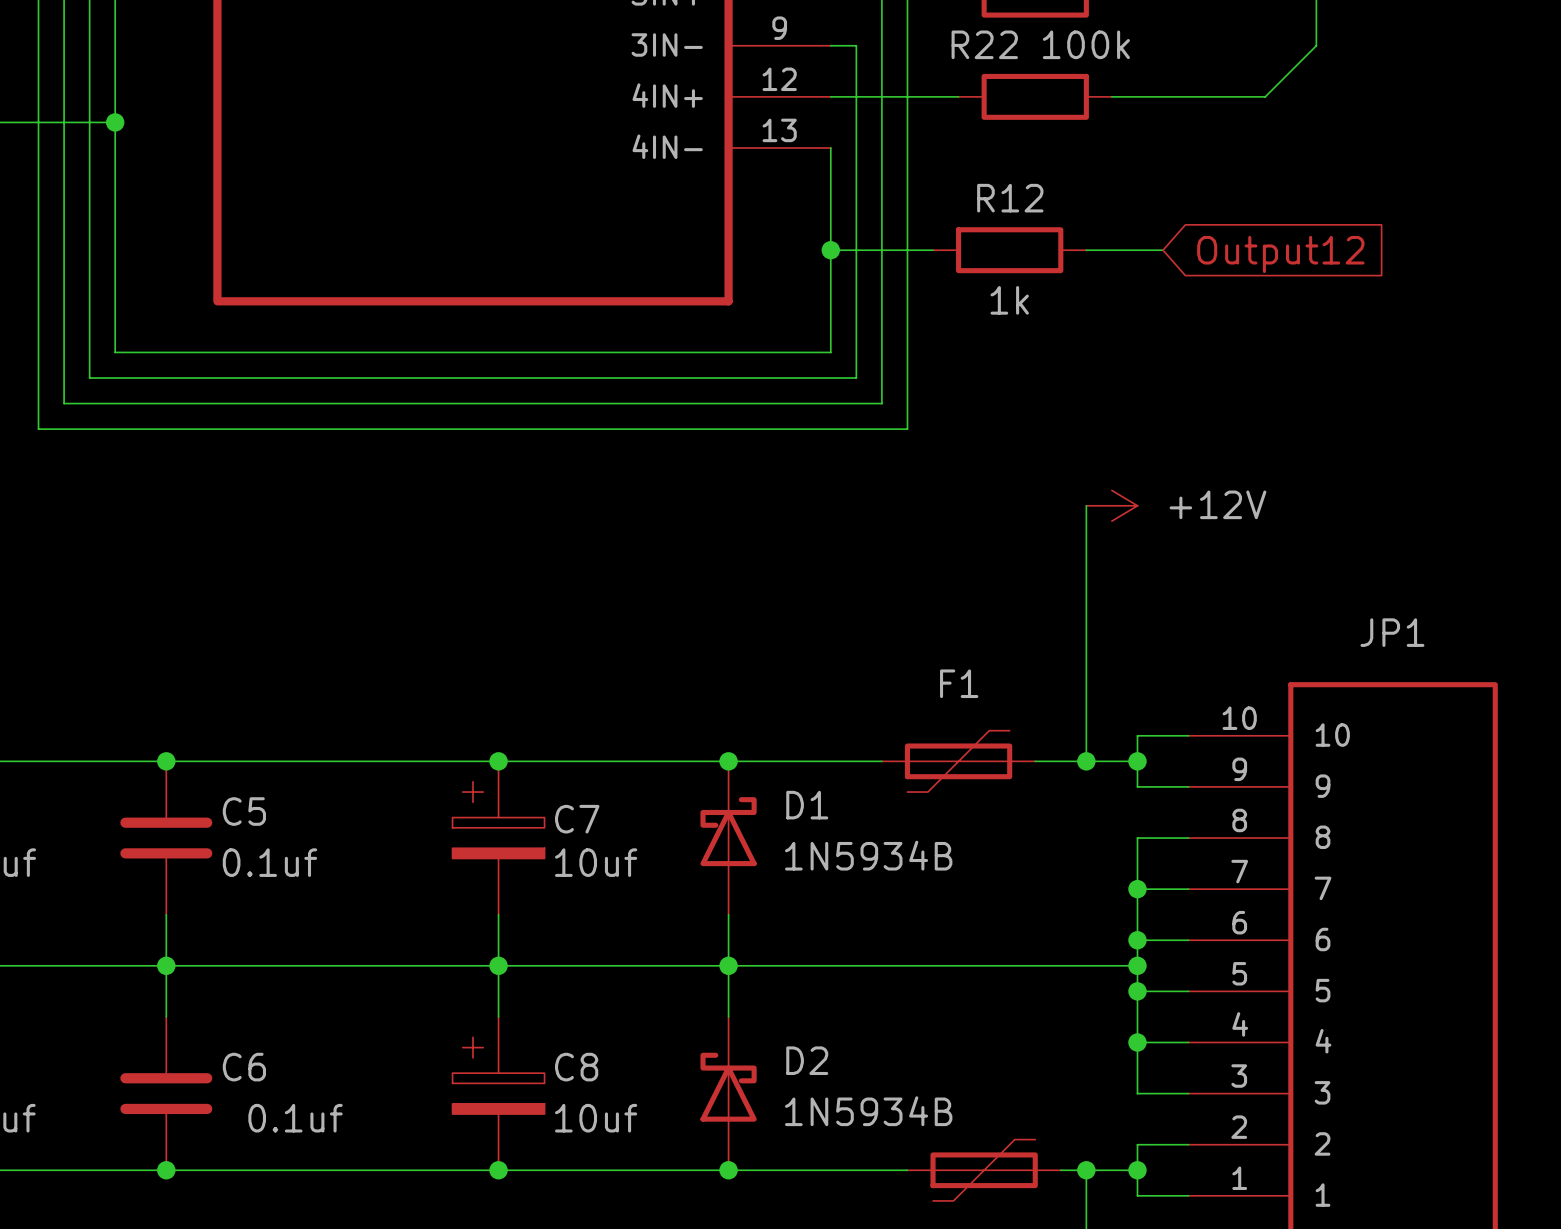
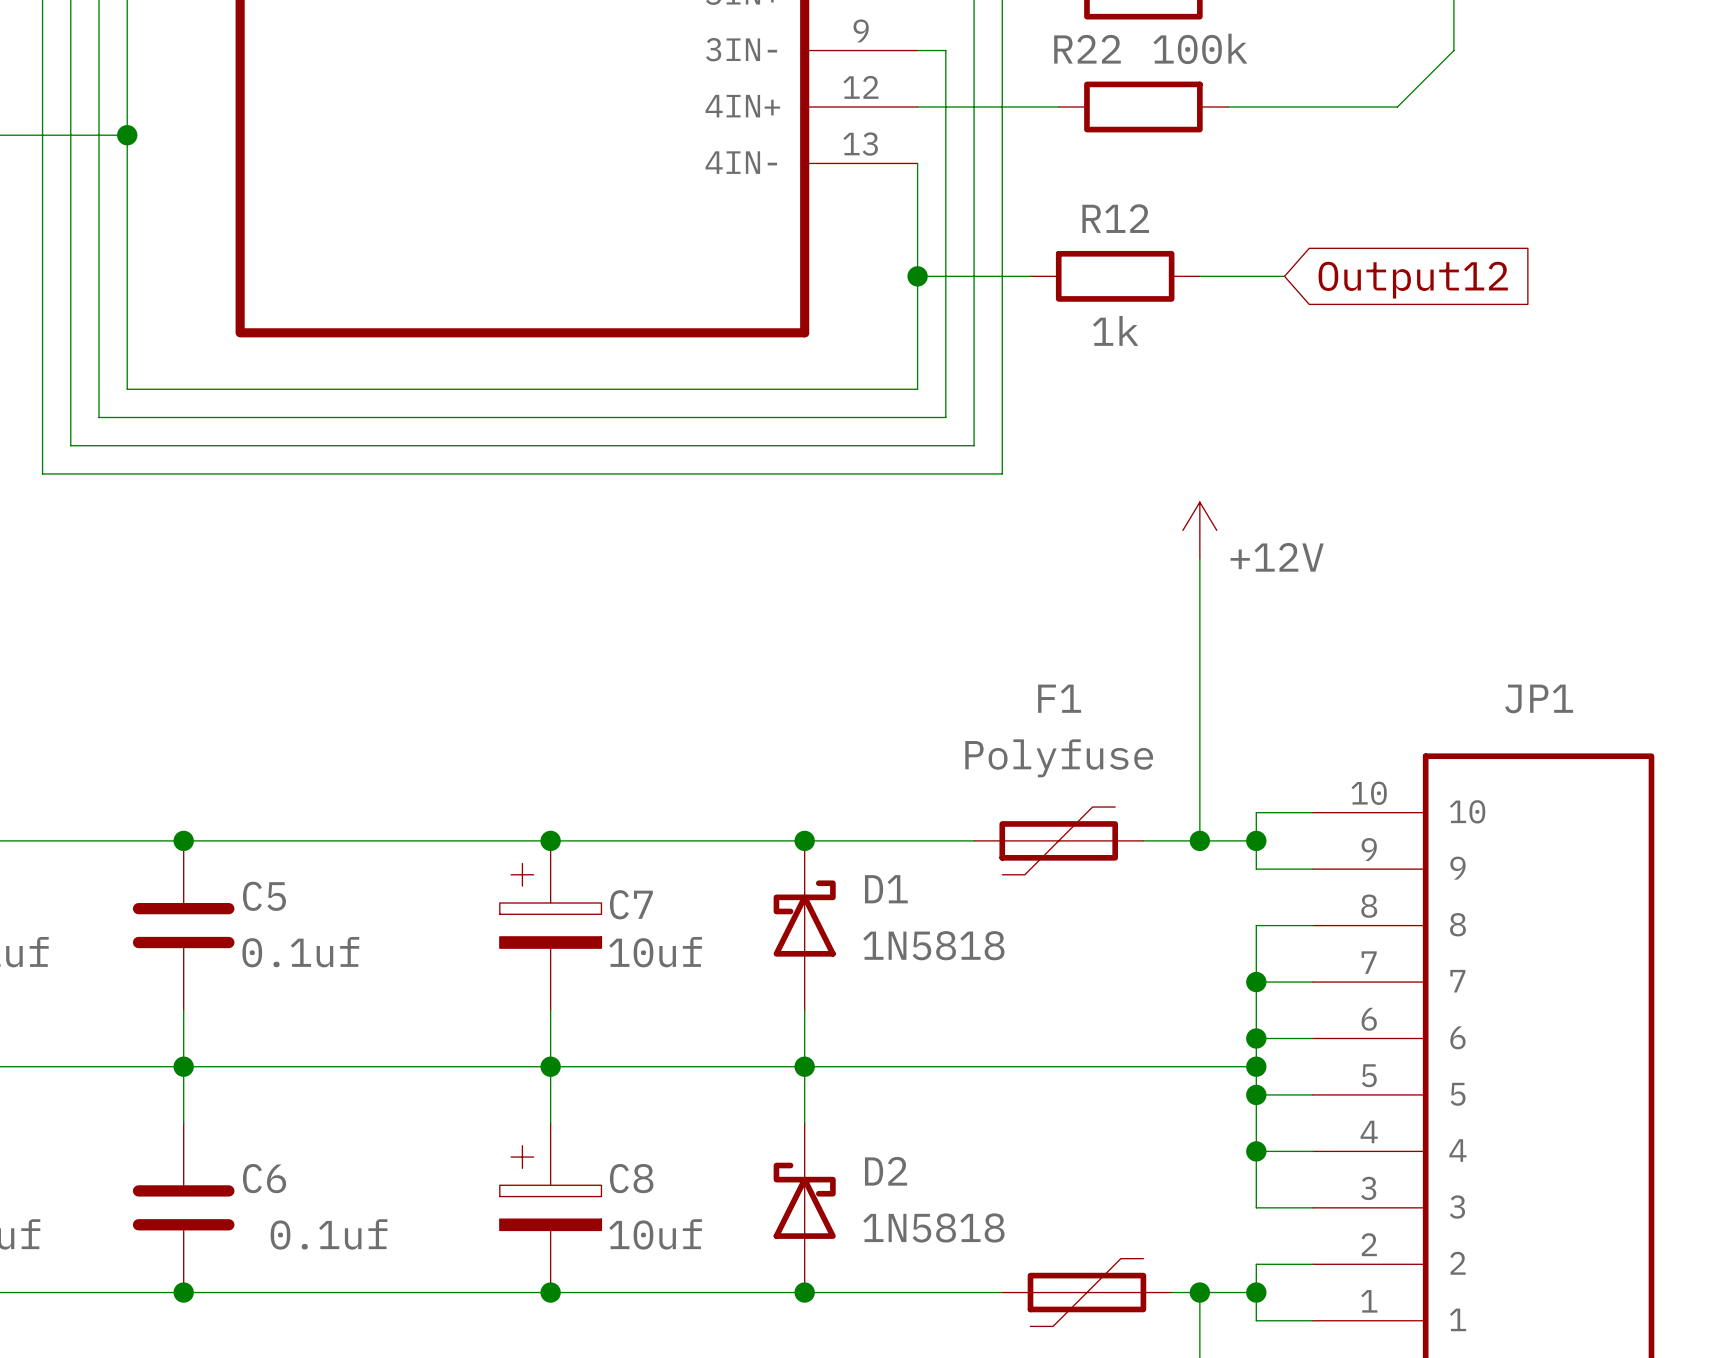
power symbol rotation: 0° (1111, 505) -> 90° counterclockwise (1199, 530)
power symbol position: +12V (1111, 505) -> +12V (1199, 530)
F1 name position: F1 (959, 683) -> F1 (1059, 698)
F1 value: none -> Polyfuse (1059, 758)
D1 value: 1N5934B (868, 855) -> 1N5818 (933, 945)
D2 value: 1N5934B (868, 1111) -> 1N5818 (933, 1227)

